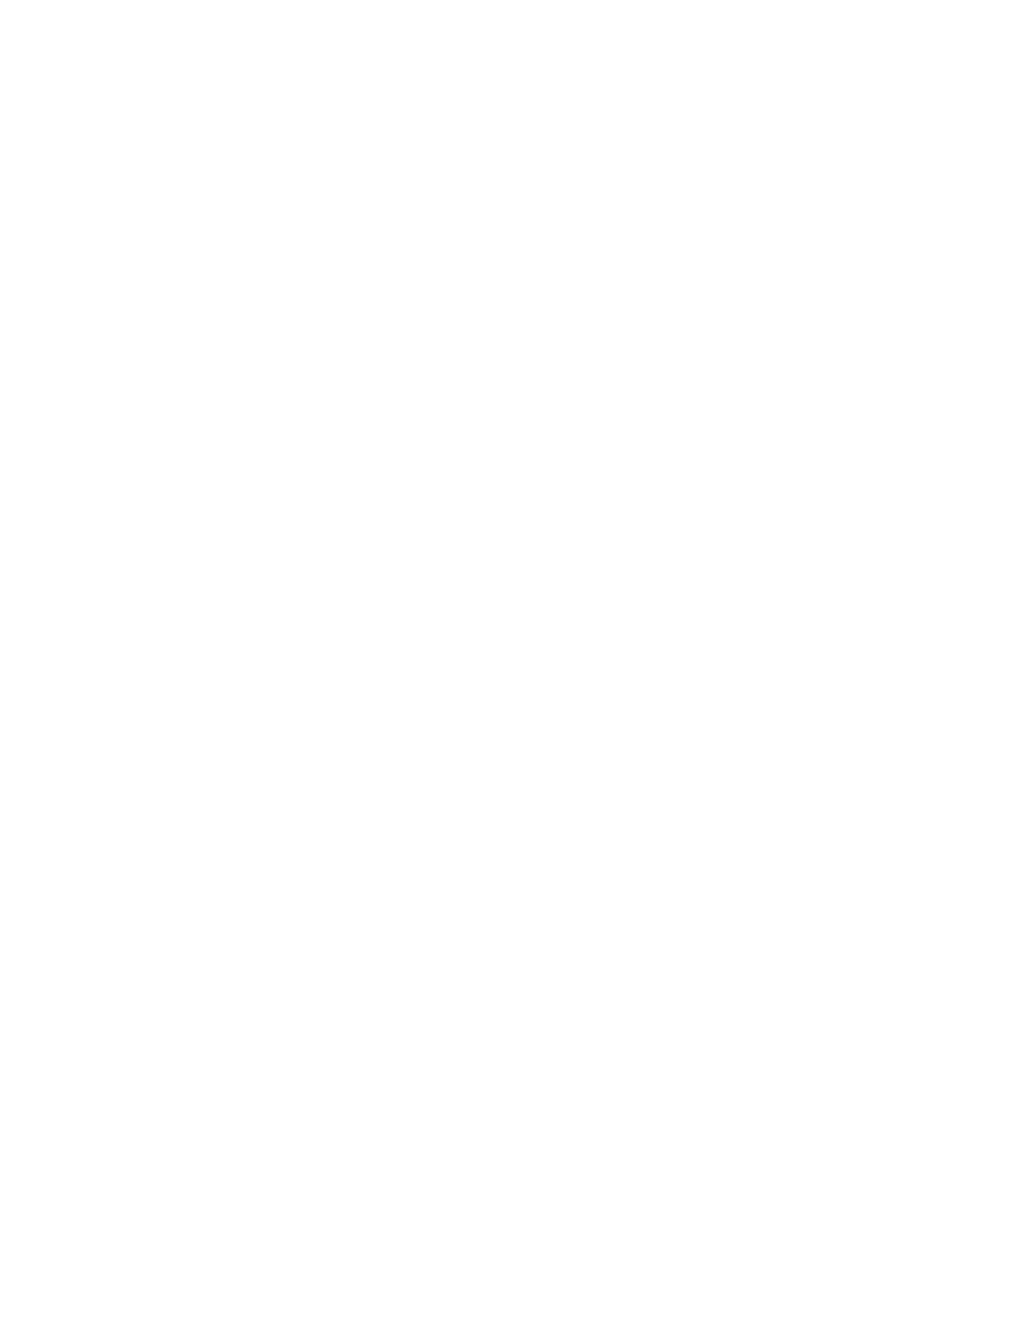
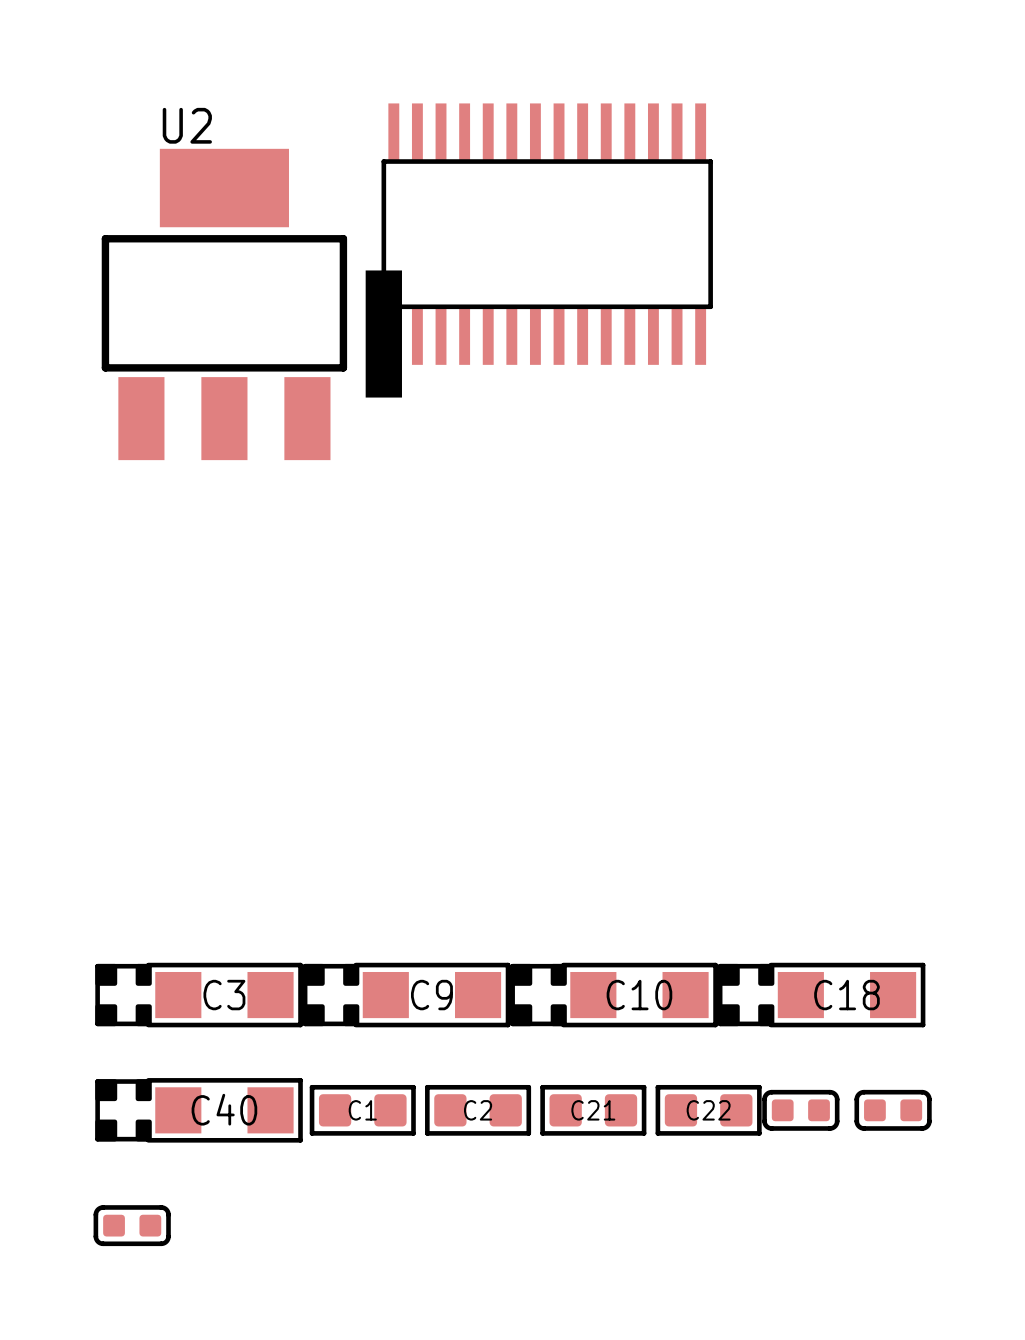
part: none -> (539, 250)
U2: none -> (224, 304)
C3: none -> (199, 995)
C9: none -> (406, 995)
C10: none -> (614, 995)
C18: none -> (821, 995)
C40: none -> (199, 1110)
C1: none -> (362, 1110)
C2: none -> (478, 1110)
C21: none -> (593, 1110)
C22: none -> (708, 1110)
part: none -> (800, 1110)
part: none -> (893, 1110)
part: none -> (132, 1225)

